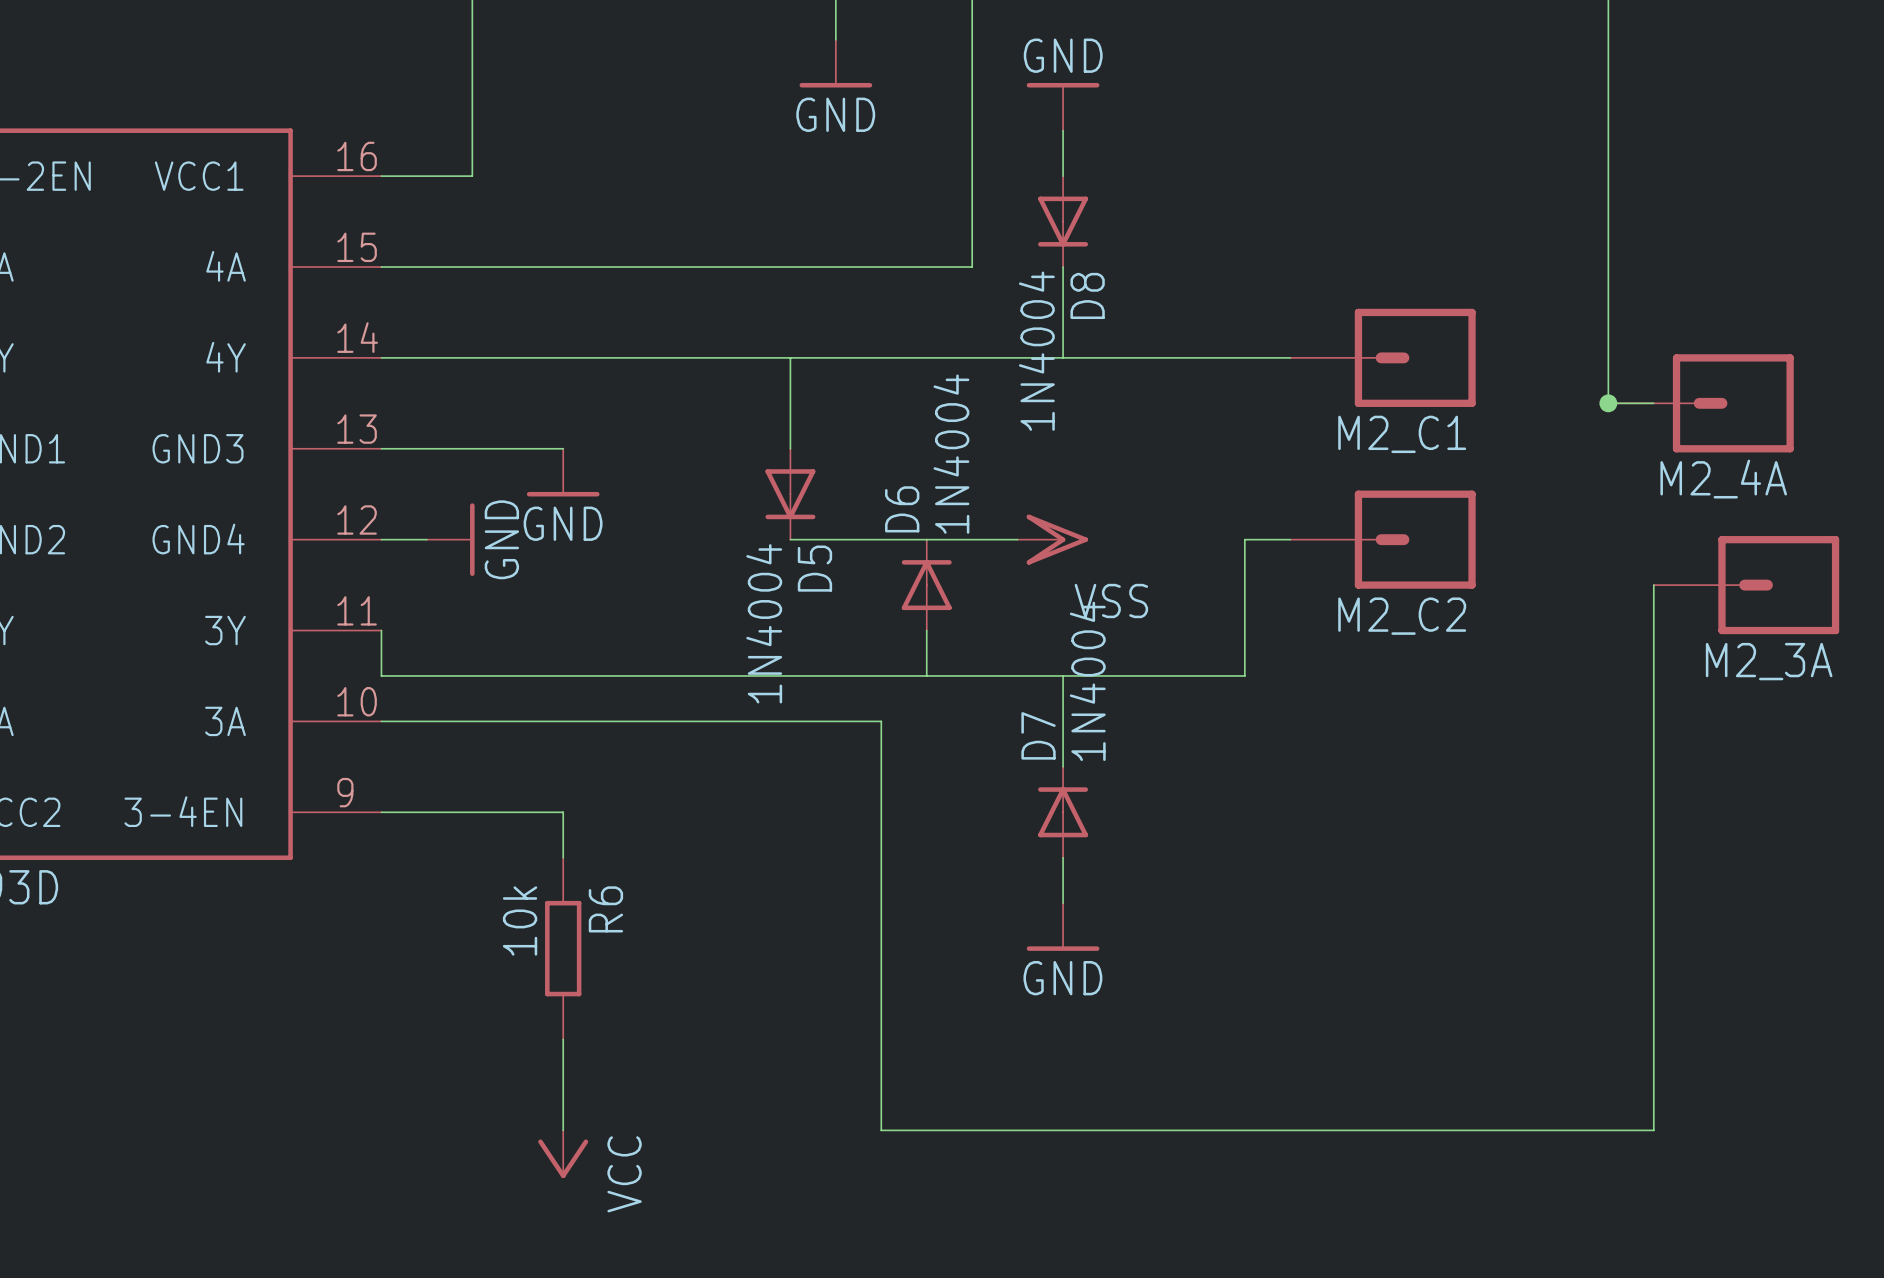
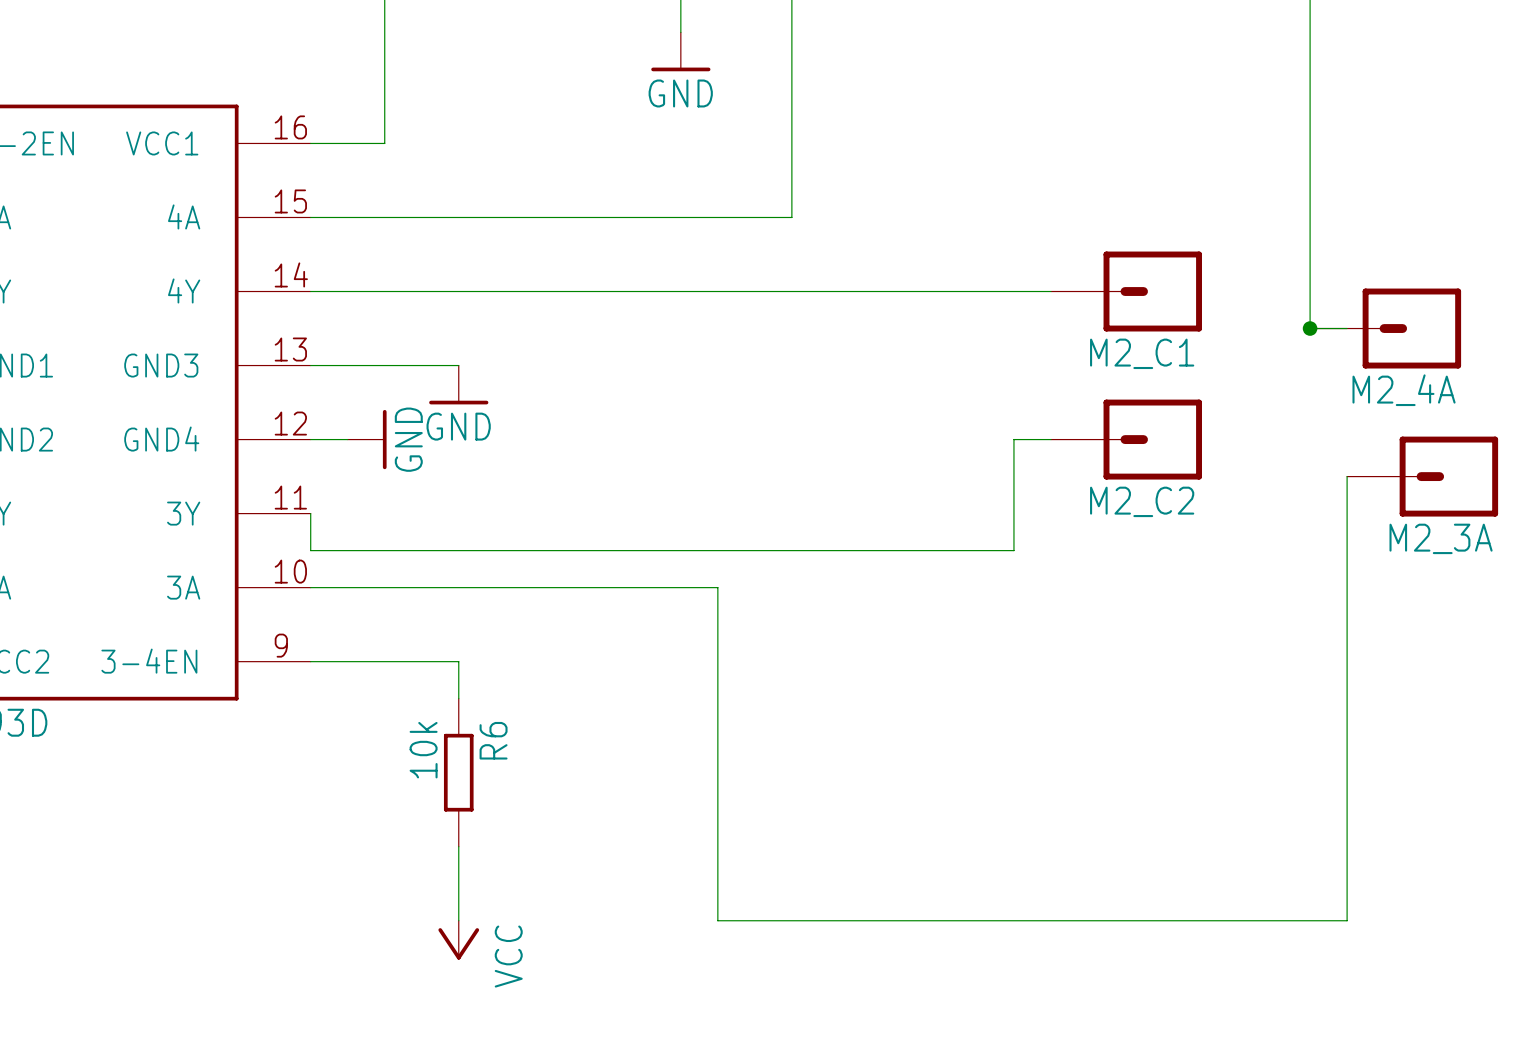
power symbol: GND (1063, 106) -> none
wire: (1063, 130) (1063, 176) -> none
D8: 1N4004 (1063, 221) -> none
wire: (1063, 267) (1063, 357) -> none
wire: (790, 357) (790, 448) -> none
D5: 1N4004 (790, 494) -> none
wire: (790, 539) (1017, 539) -> none
power symbol: VSS (1052, 539) -> none
D6: 1N4004 (926, 585) -> none
wire: (926, 630) (926, 675) -> none
wire: (1063, 675) (1063, 766) -> none
D7: 1N4004 (1063, 812) -> none
wire: (1063, 857) (1063, 903) -> none
power symbol: GND (1063, 927) -> none

